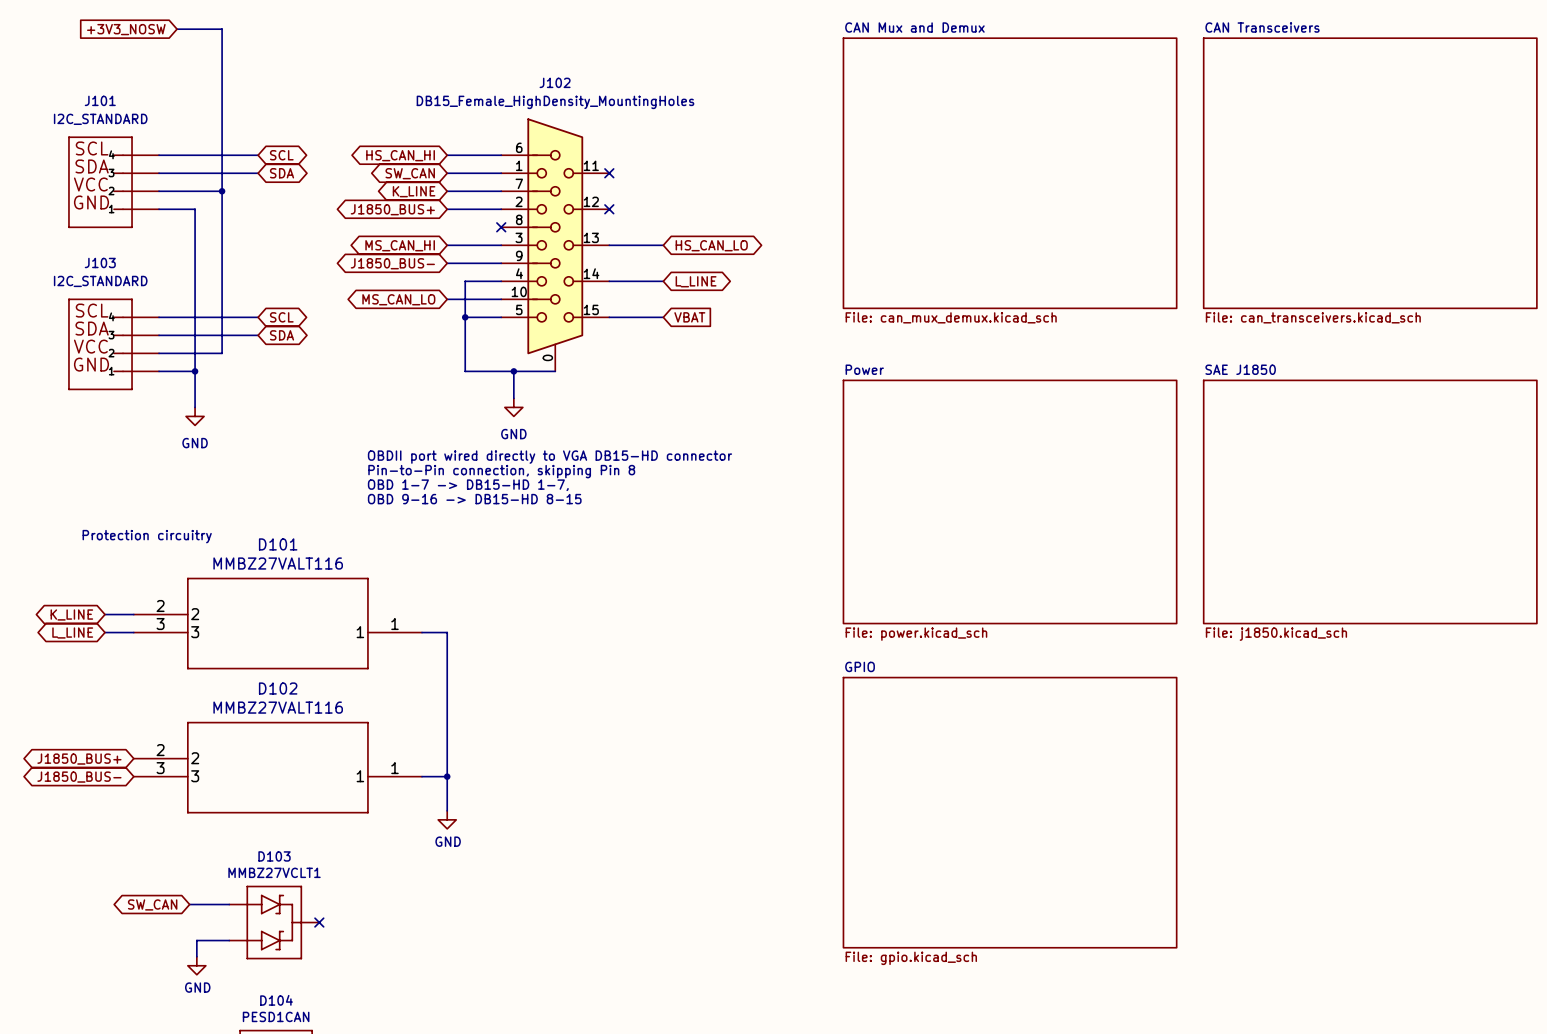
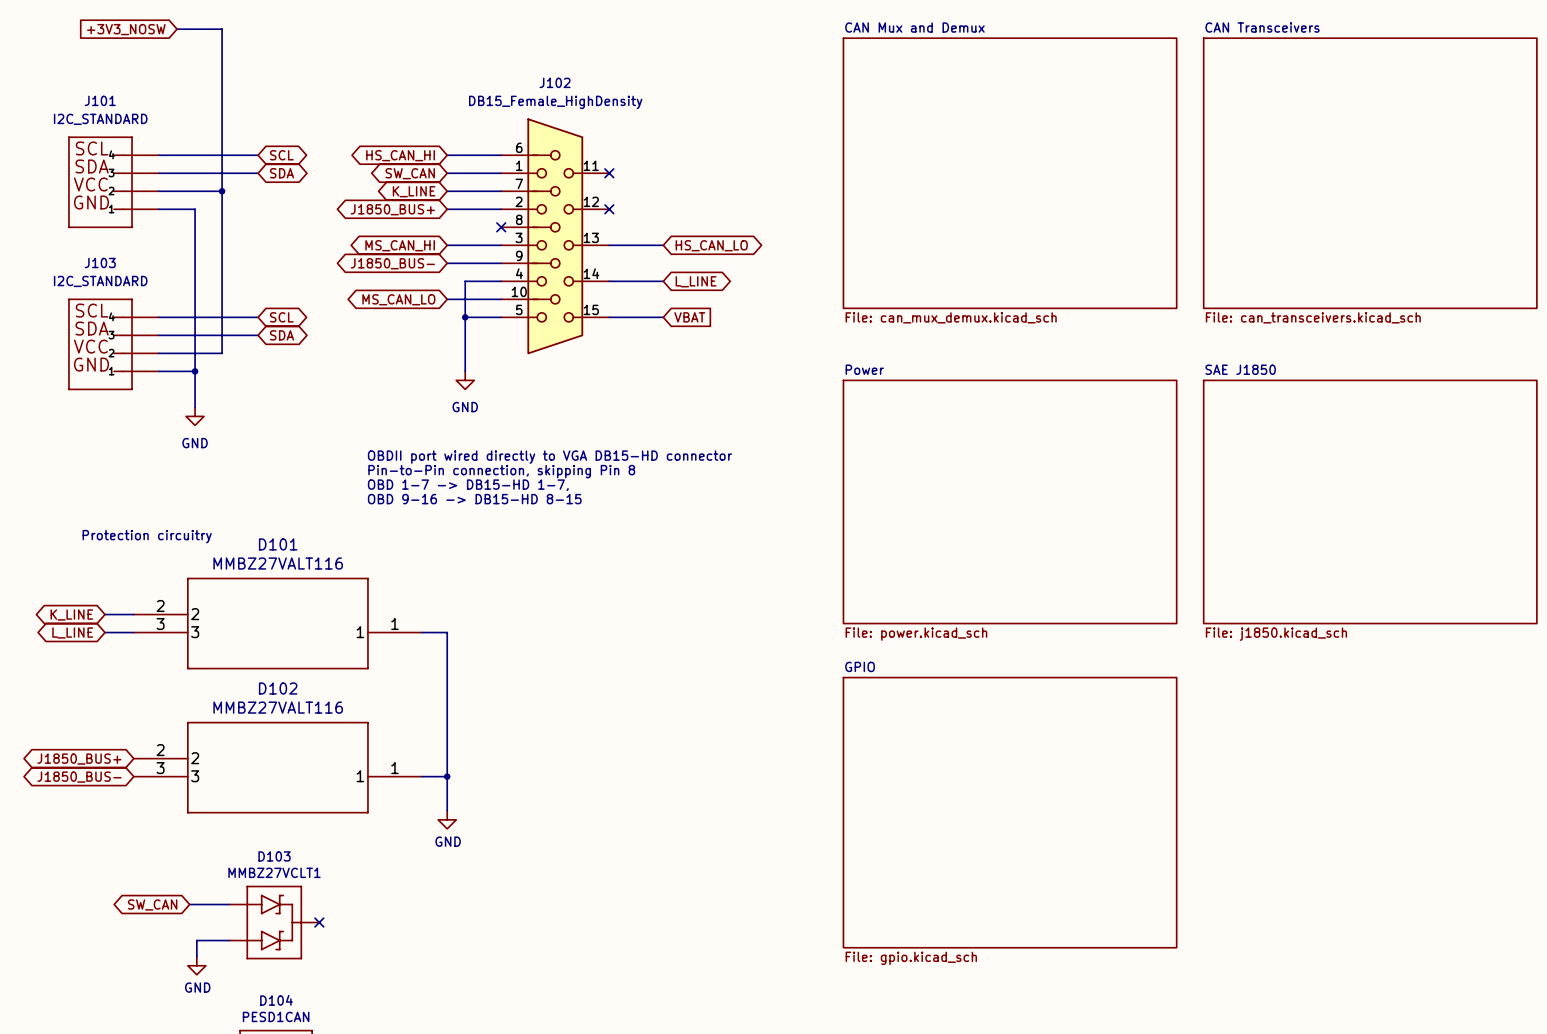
J102 value: DB15_Female_HighDensity_MountingHoles (555, 102) -> DB15_Female_HighDensity (555, 102)
J102 symbol: [501, 118, 610, 372] -> [501, 118, 610, 355]
wire: (465, 371) (555, 371) -> none
wire: (513, 371) (513, 398) -> none
junction: (513, 371) -> none
power symbol position: GND (513, 407) -> GND (465, 380)

